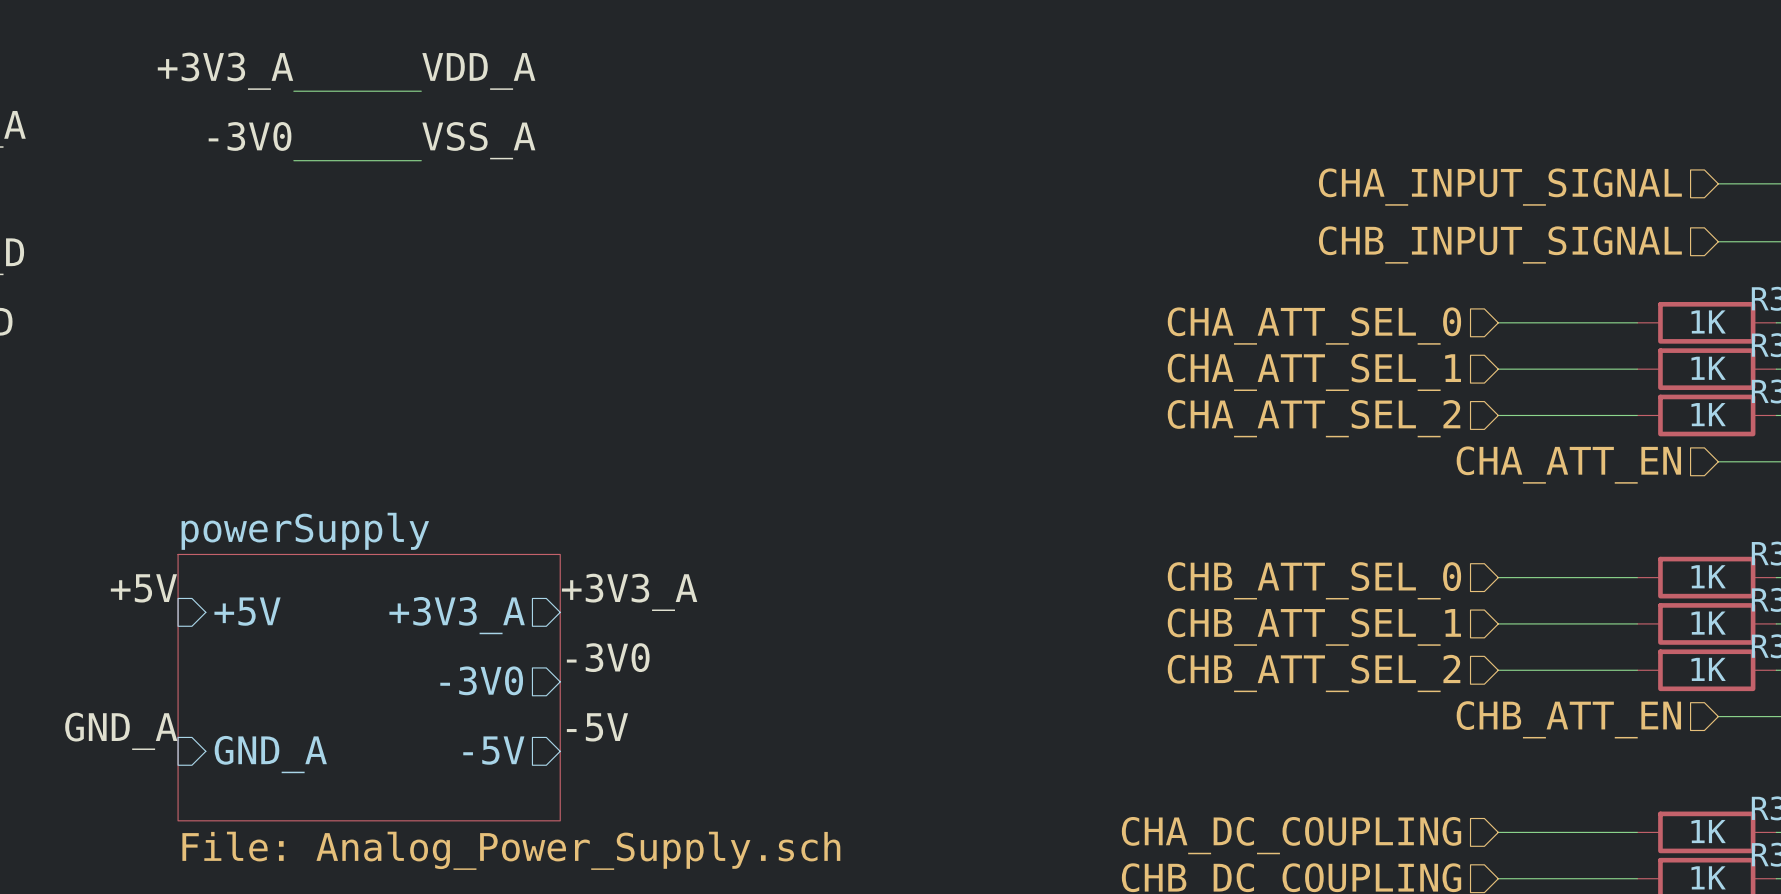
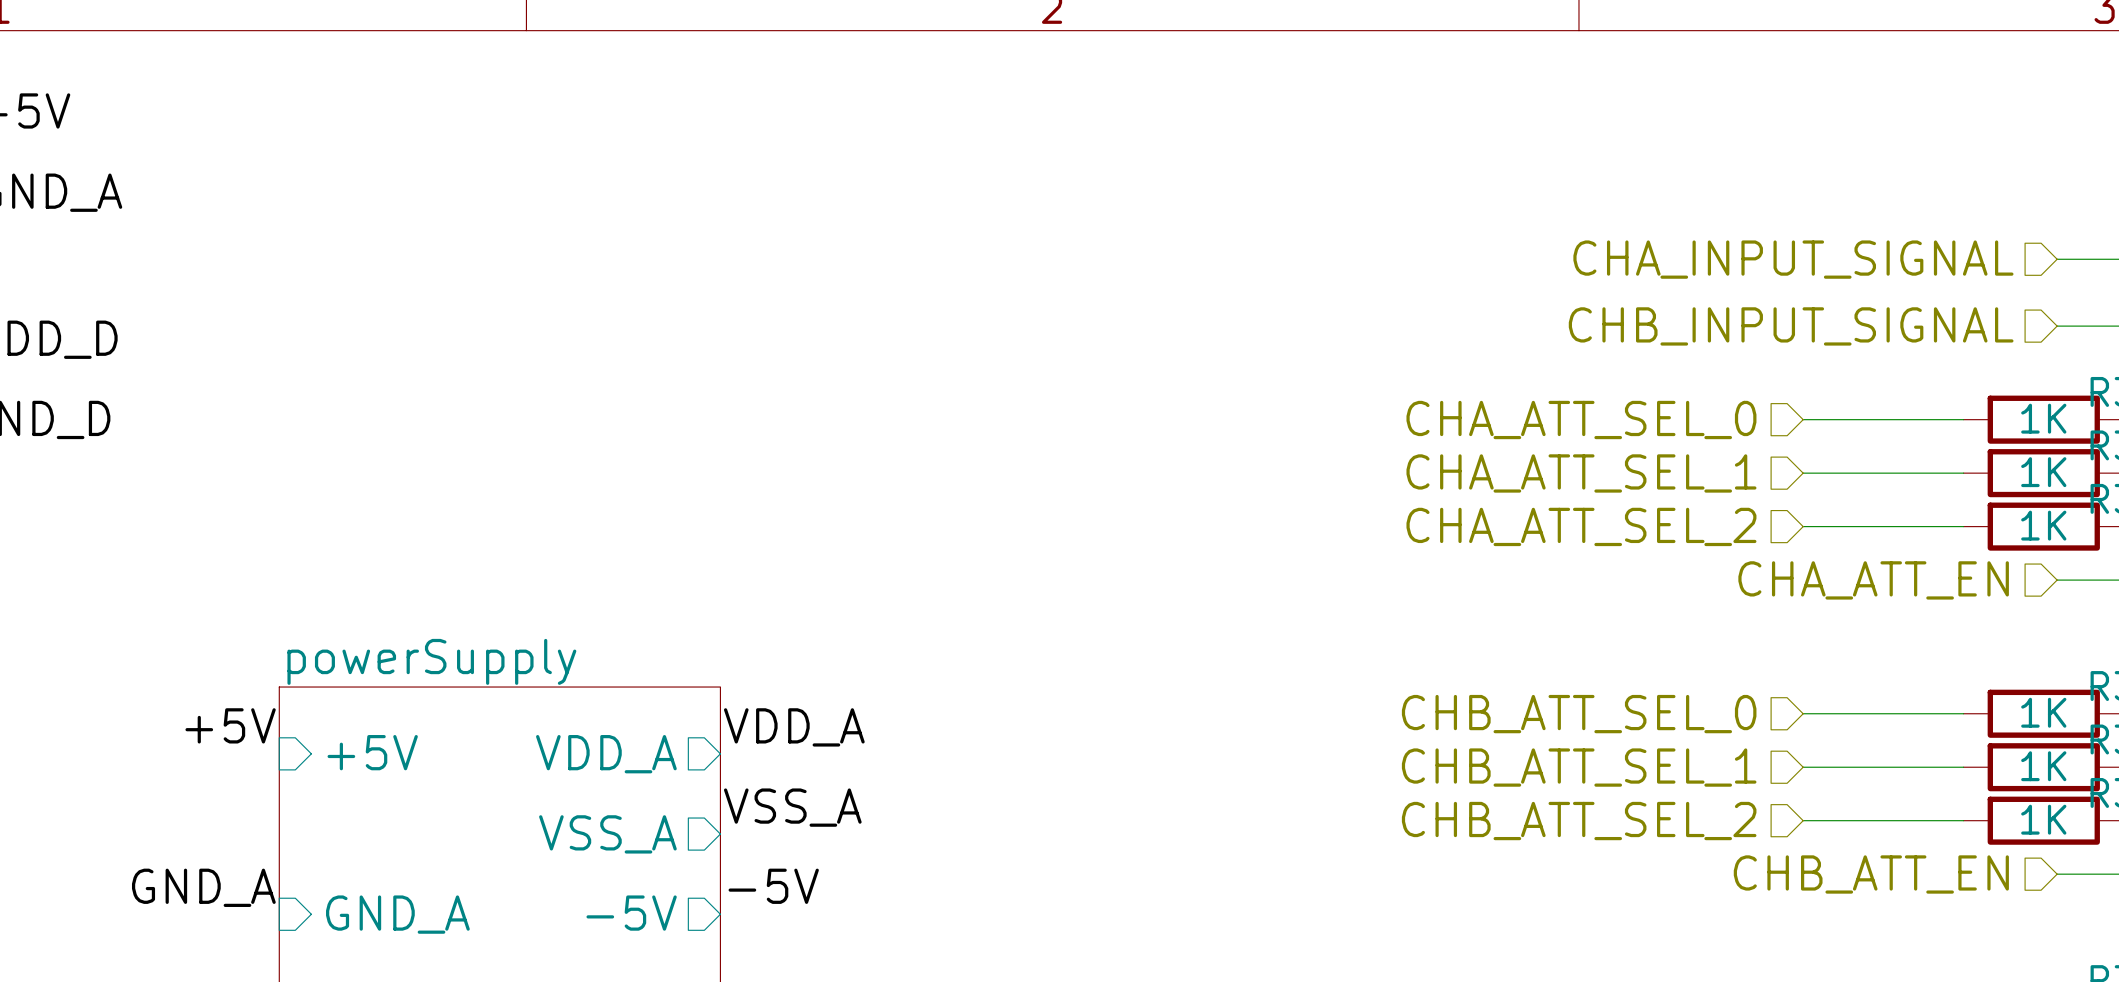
label: +3V3_A (225, 71) -> none
label: VDD_A (478, 71) -> none
wire: (293, 91) (421, 91) -> none
label: -3V0 (250, 136) -> none
label: VSS_A (478, 140) -> none
wire: (293, 160) (421, 160) -> none
label: +3V3_A (629, 592) -> VDD_A (794, 727)
sheet pin: +3V3_A (457, 615) -> VDD_A (606, 754)
label: -3V0 (608, 657) -> VSS_A (792, 807)
sheet pin: -3V0 (481, 680) -> VSS_A (607, 834)

